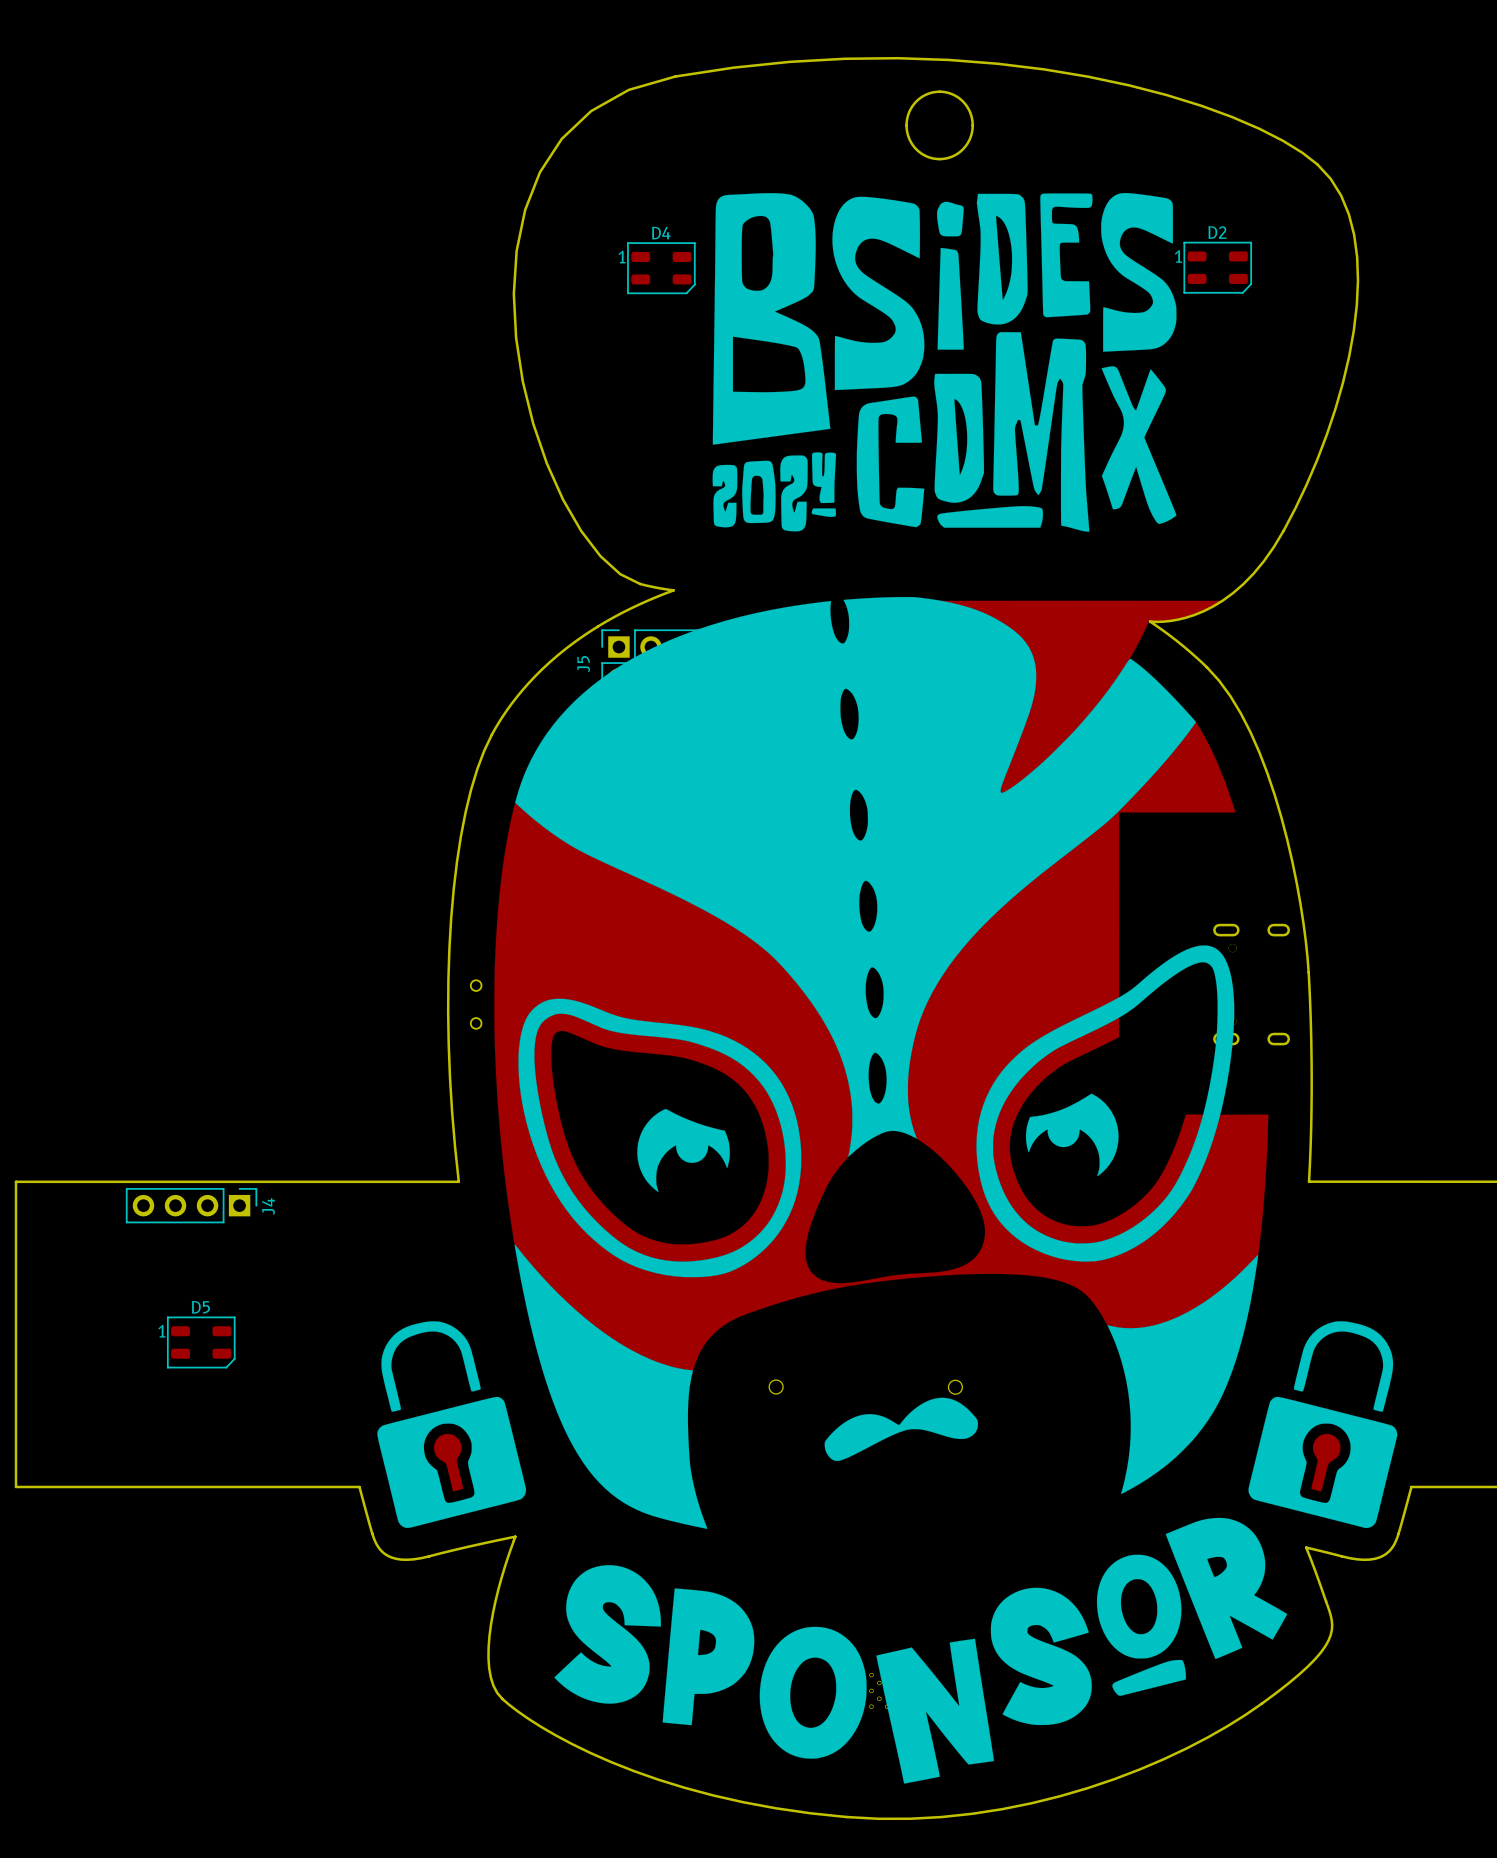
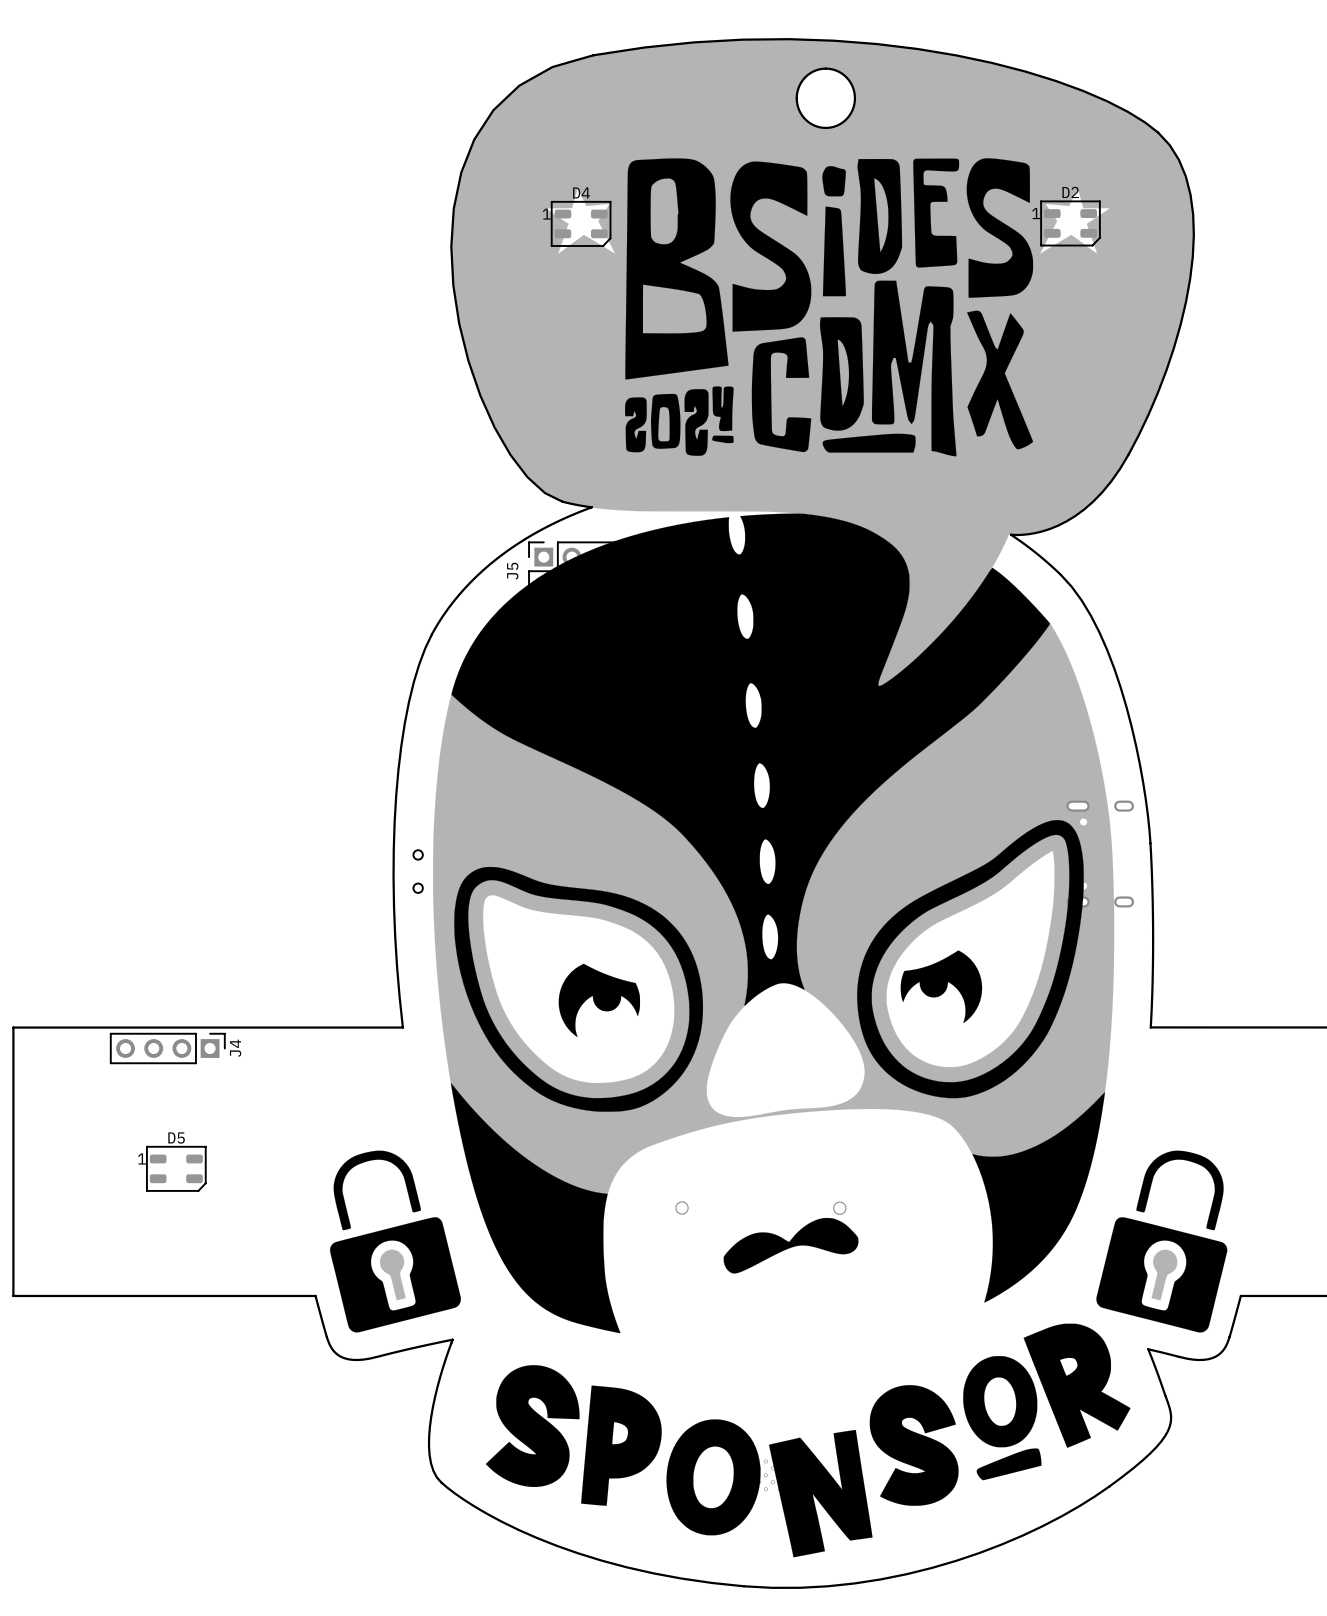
drawing: none -> [330, 39, 1228, 1558]
drawing: [377, 192, 1398, 1784] -> none

